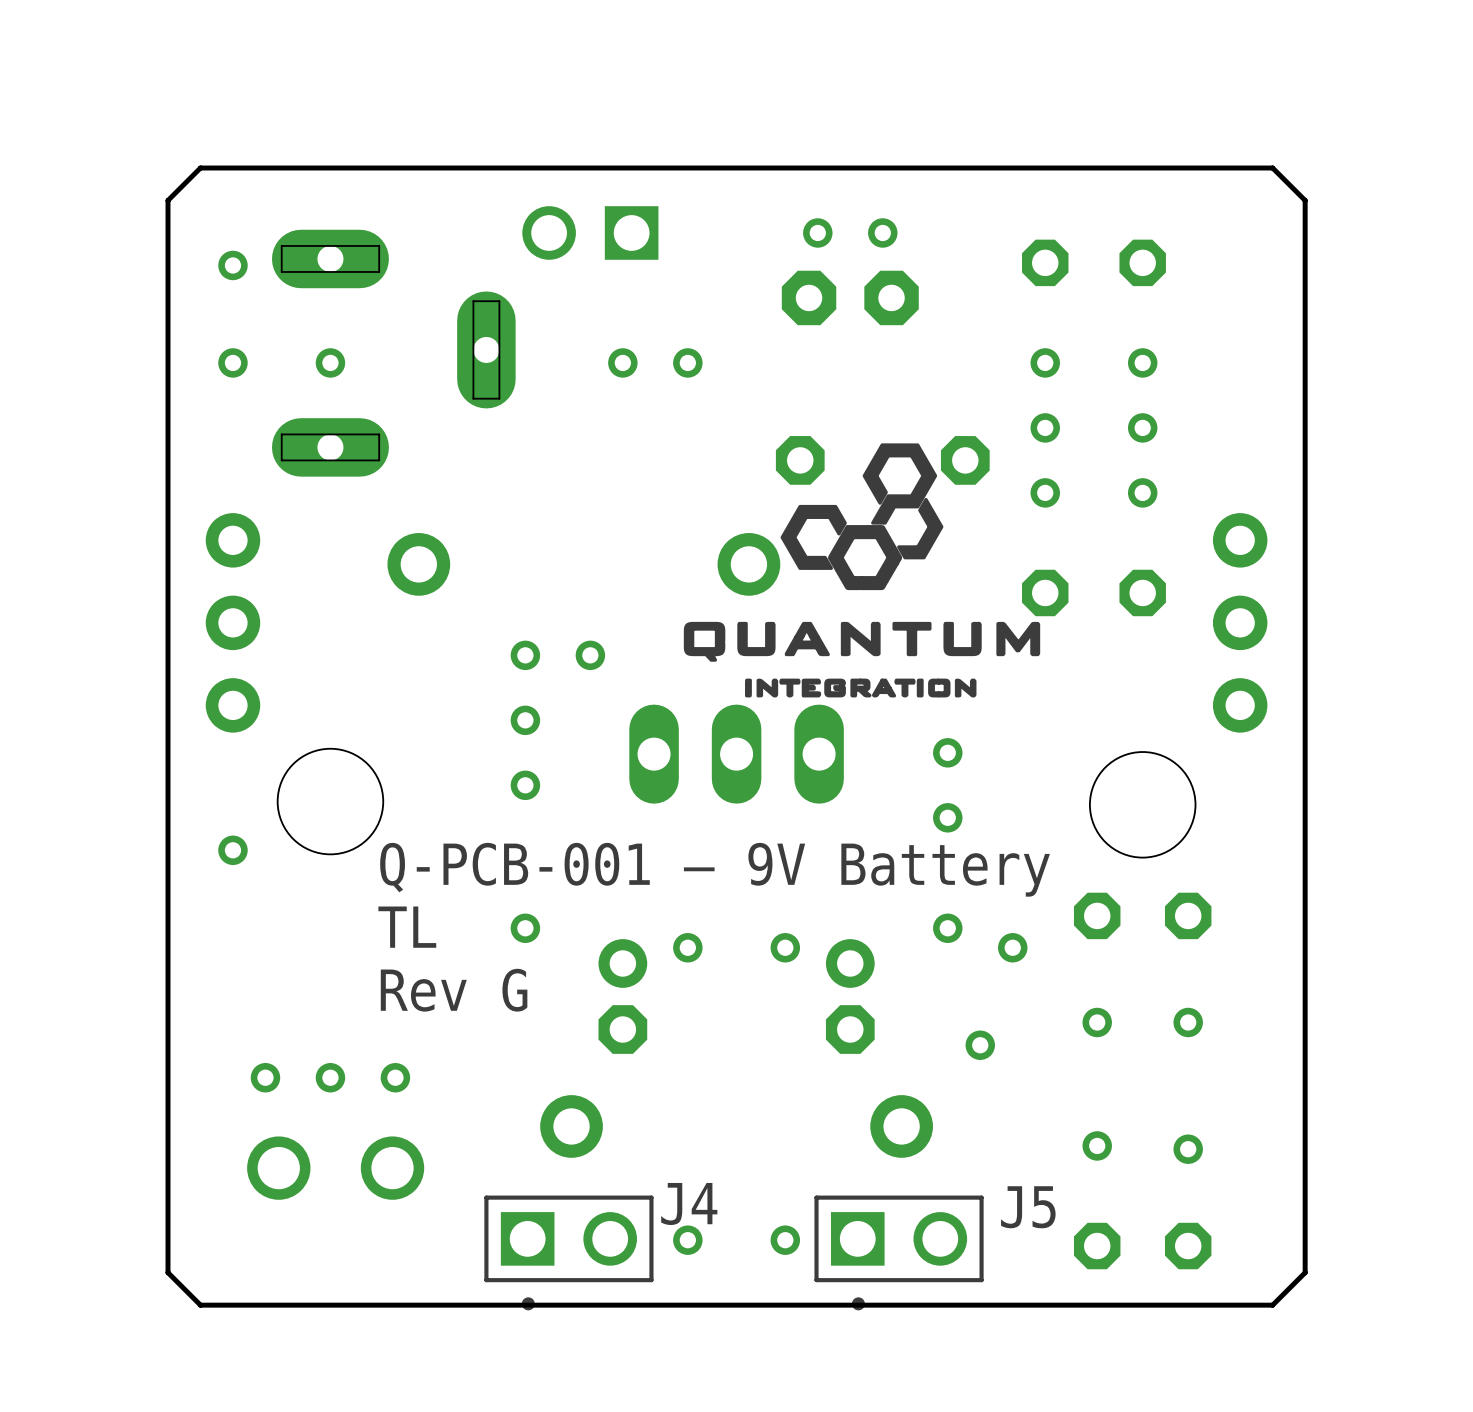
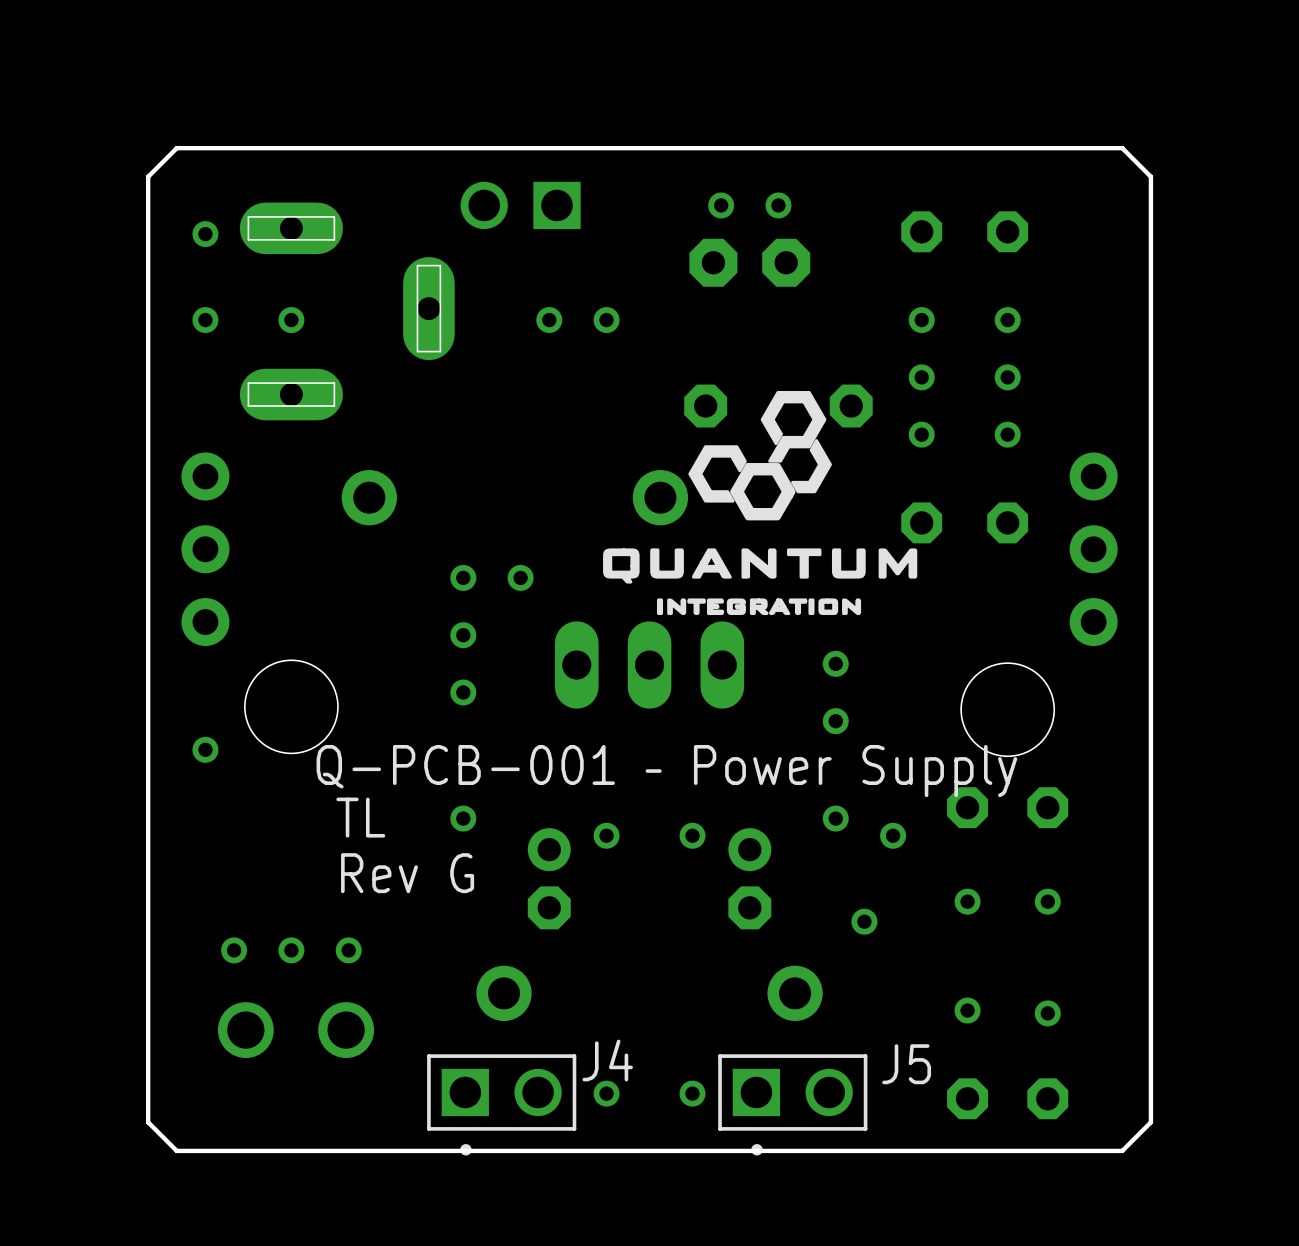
text: Q-PCB-001 – 9V Battery (715, 869) -> Q-PCB-001 – Power Supply (666, 771)

